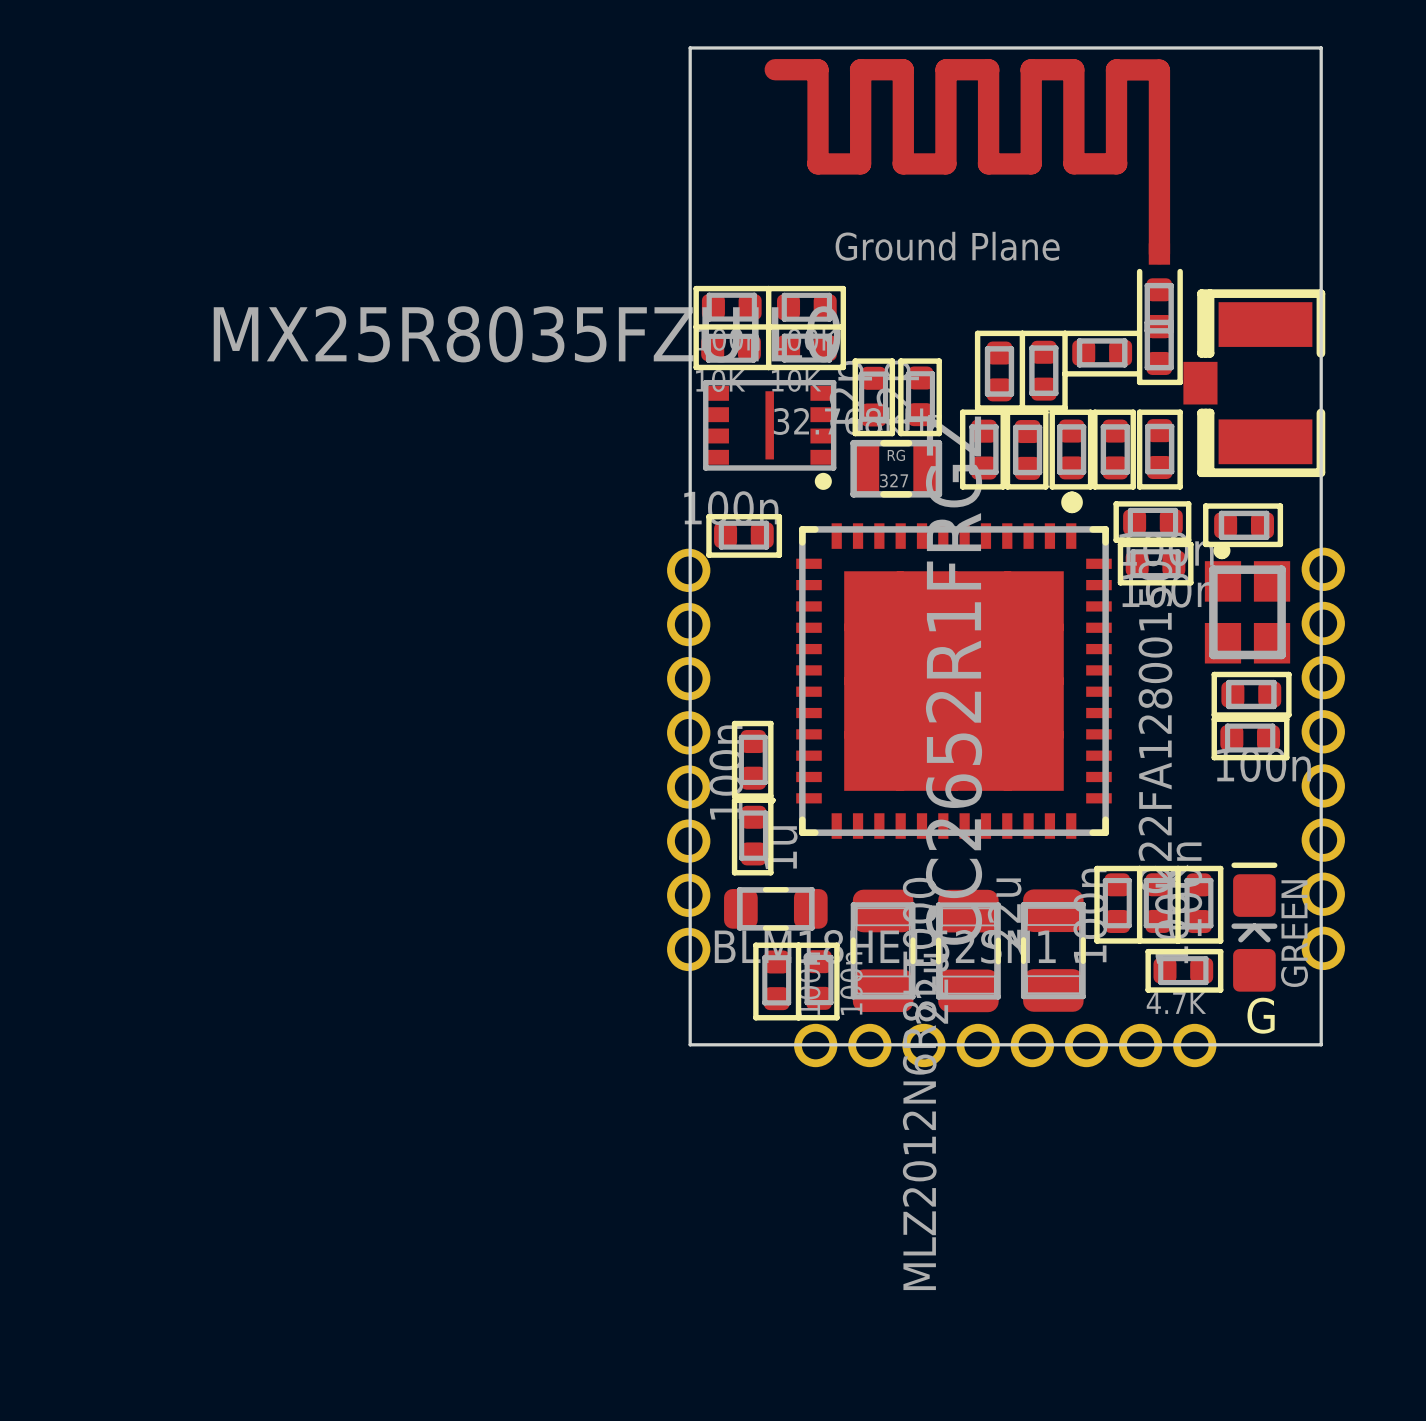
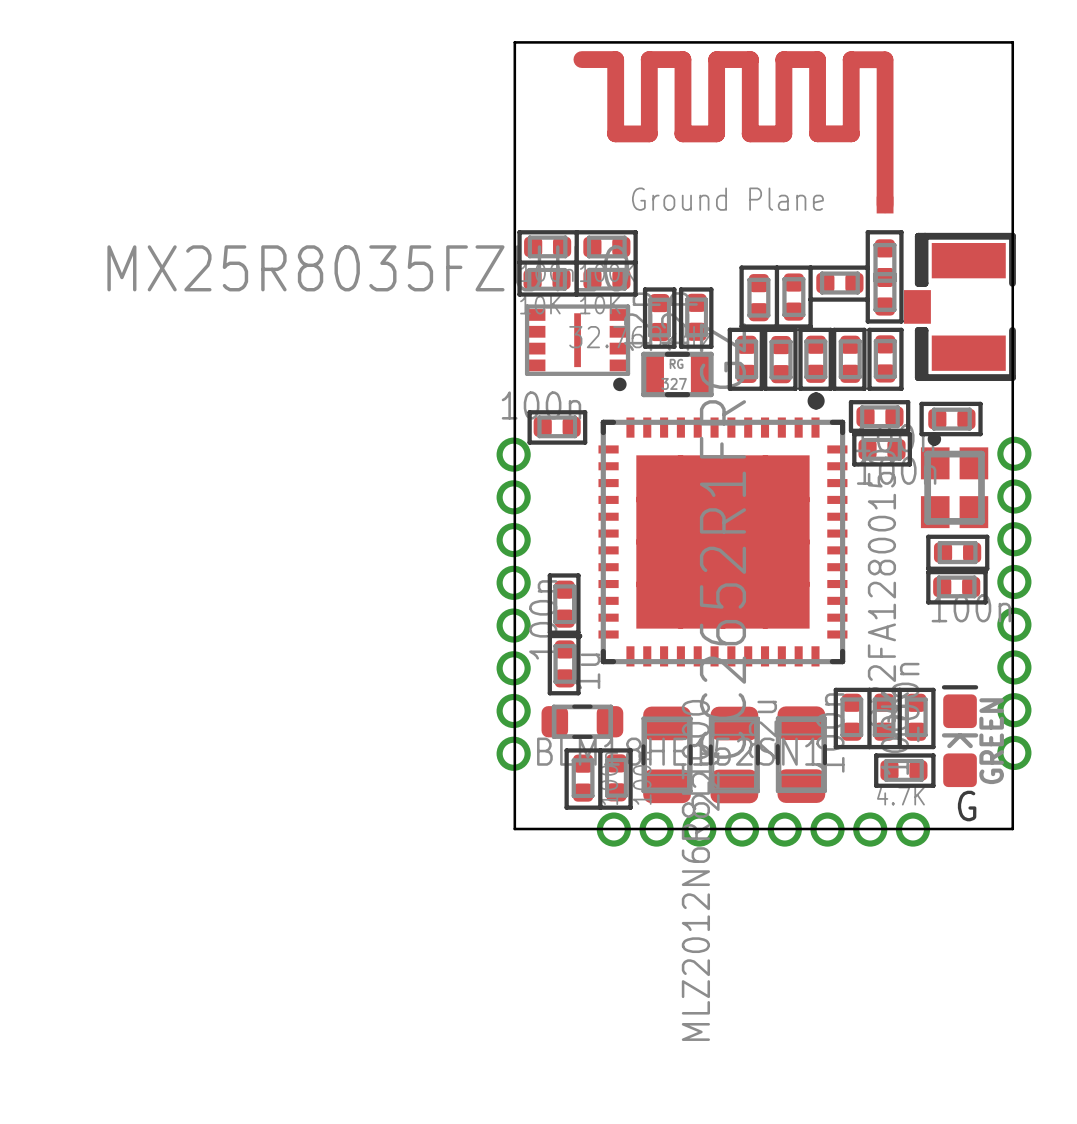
line: (1139, 271) (1139, 382) (1180, 382) -> (901, 232) (867, 232) (867, 321) (901, 321) (901, 306)
line: (1180, 271) (1180, 288) -> none
part: (1159, 308) -> none
part: none -> (884, 262)
part: (1159, 345) -> none
part: none -> (884, 291)

